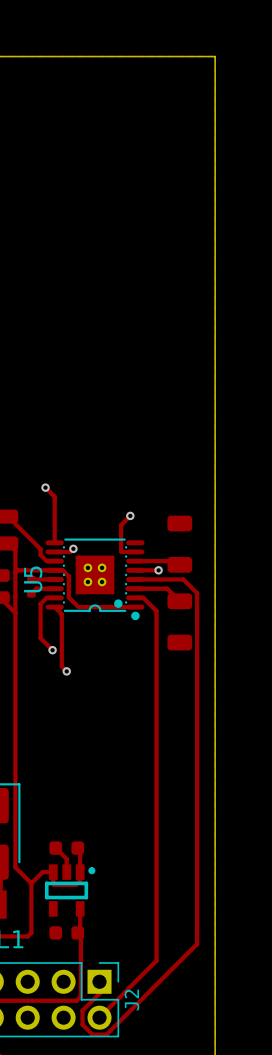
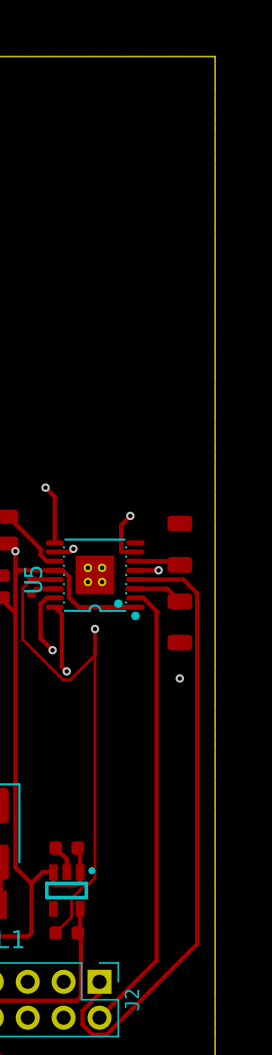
via: none -> (15, 551)
track: none -> (31, 579) (22, 588) (22, 639) (63, 679) (70, 679) (95, 655)
track: none -> (95, 628) (95, 877) (71, 898) (71, 917) (55, 932)
via: none -> (95, 628)
via: none -> (179, 678)

